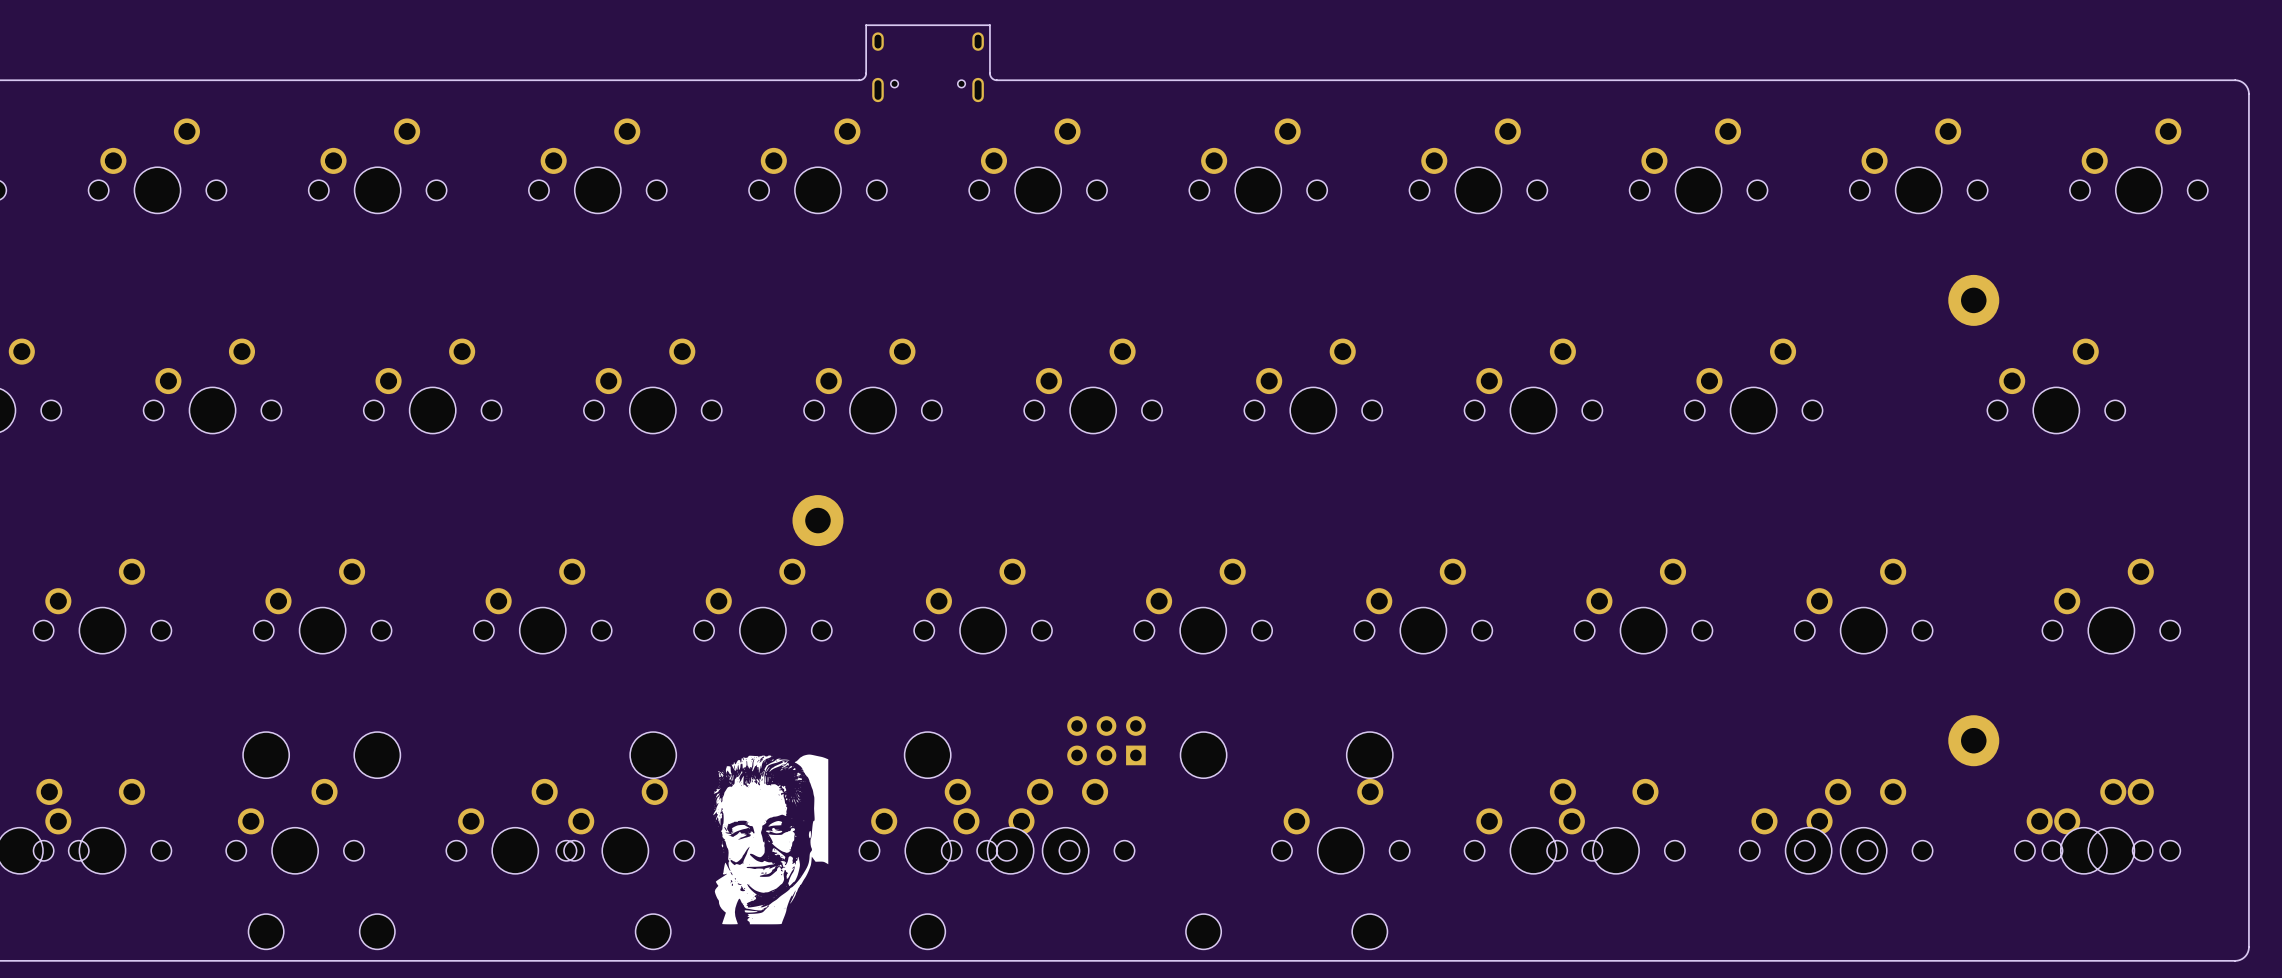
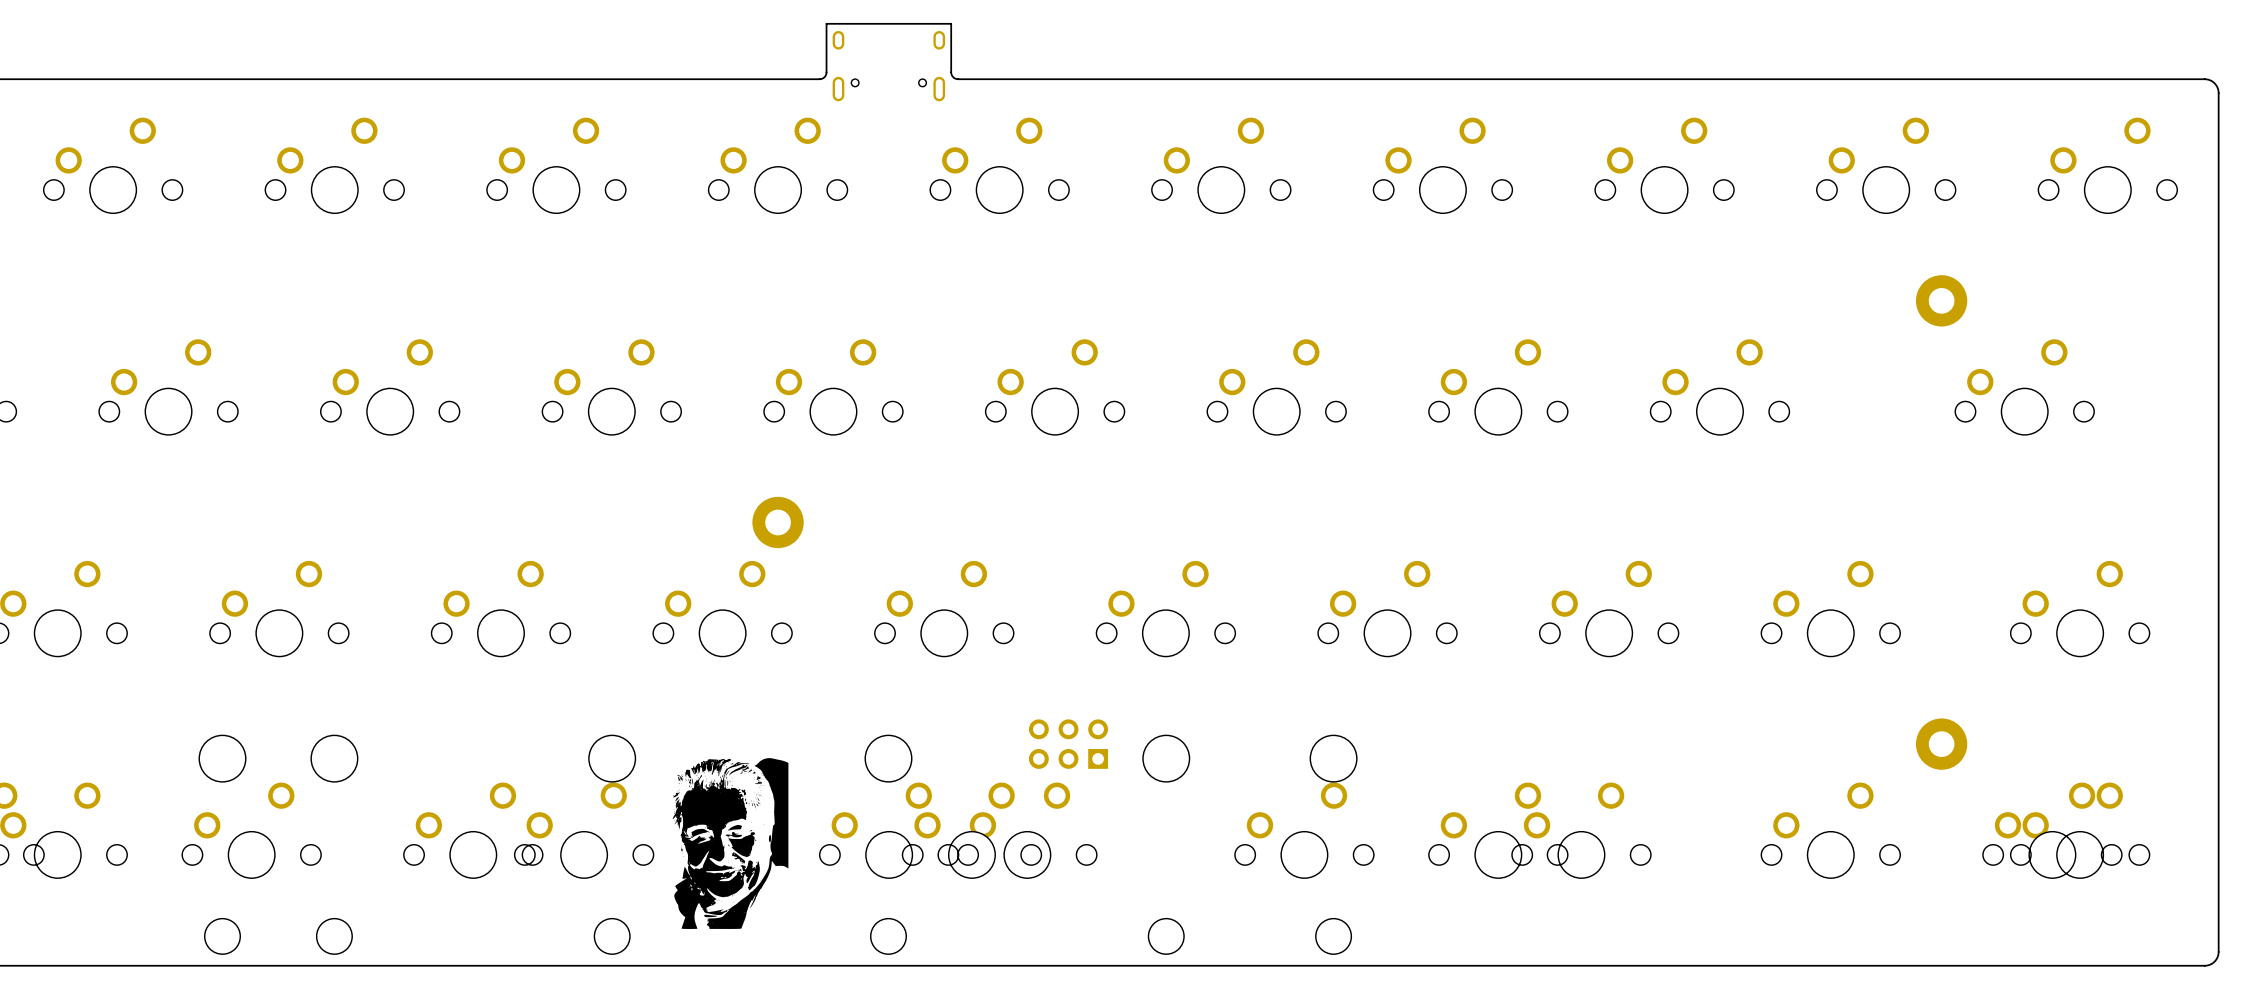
part: (1808, 826) -> none

